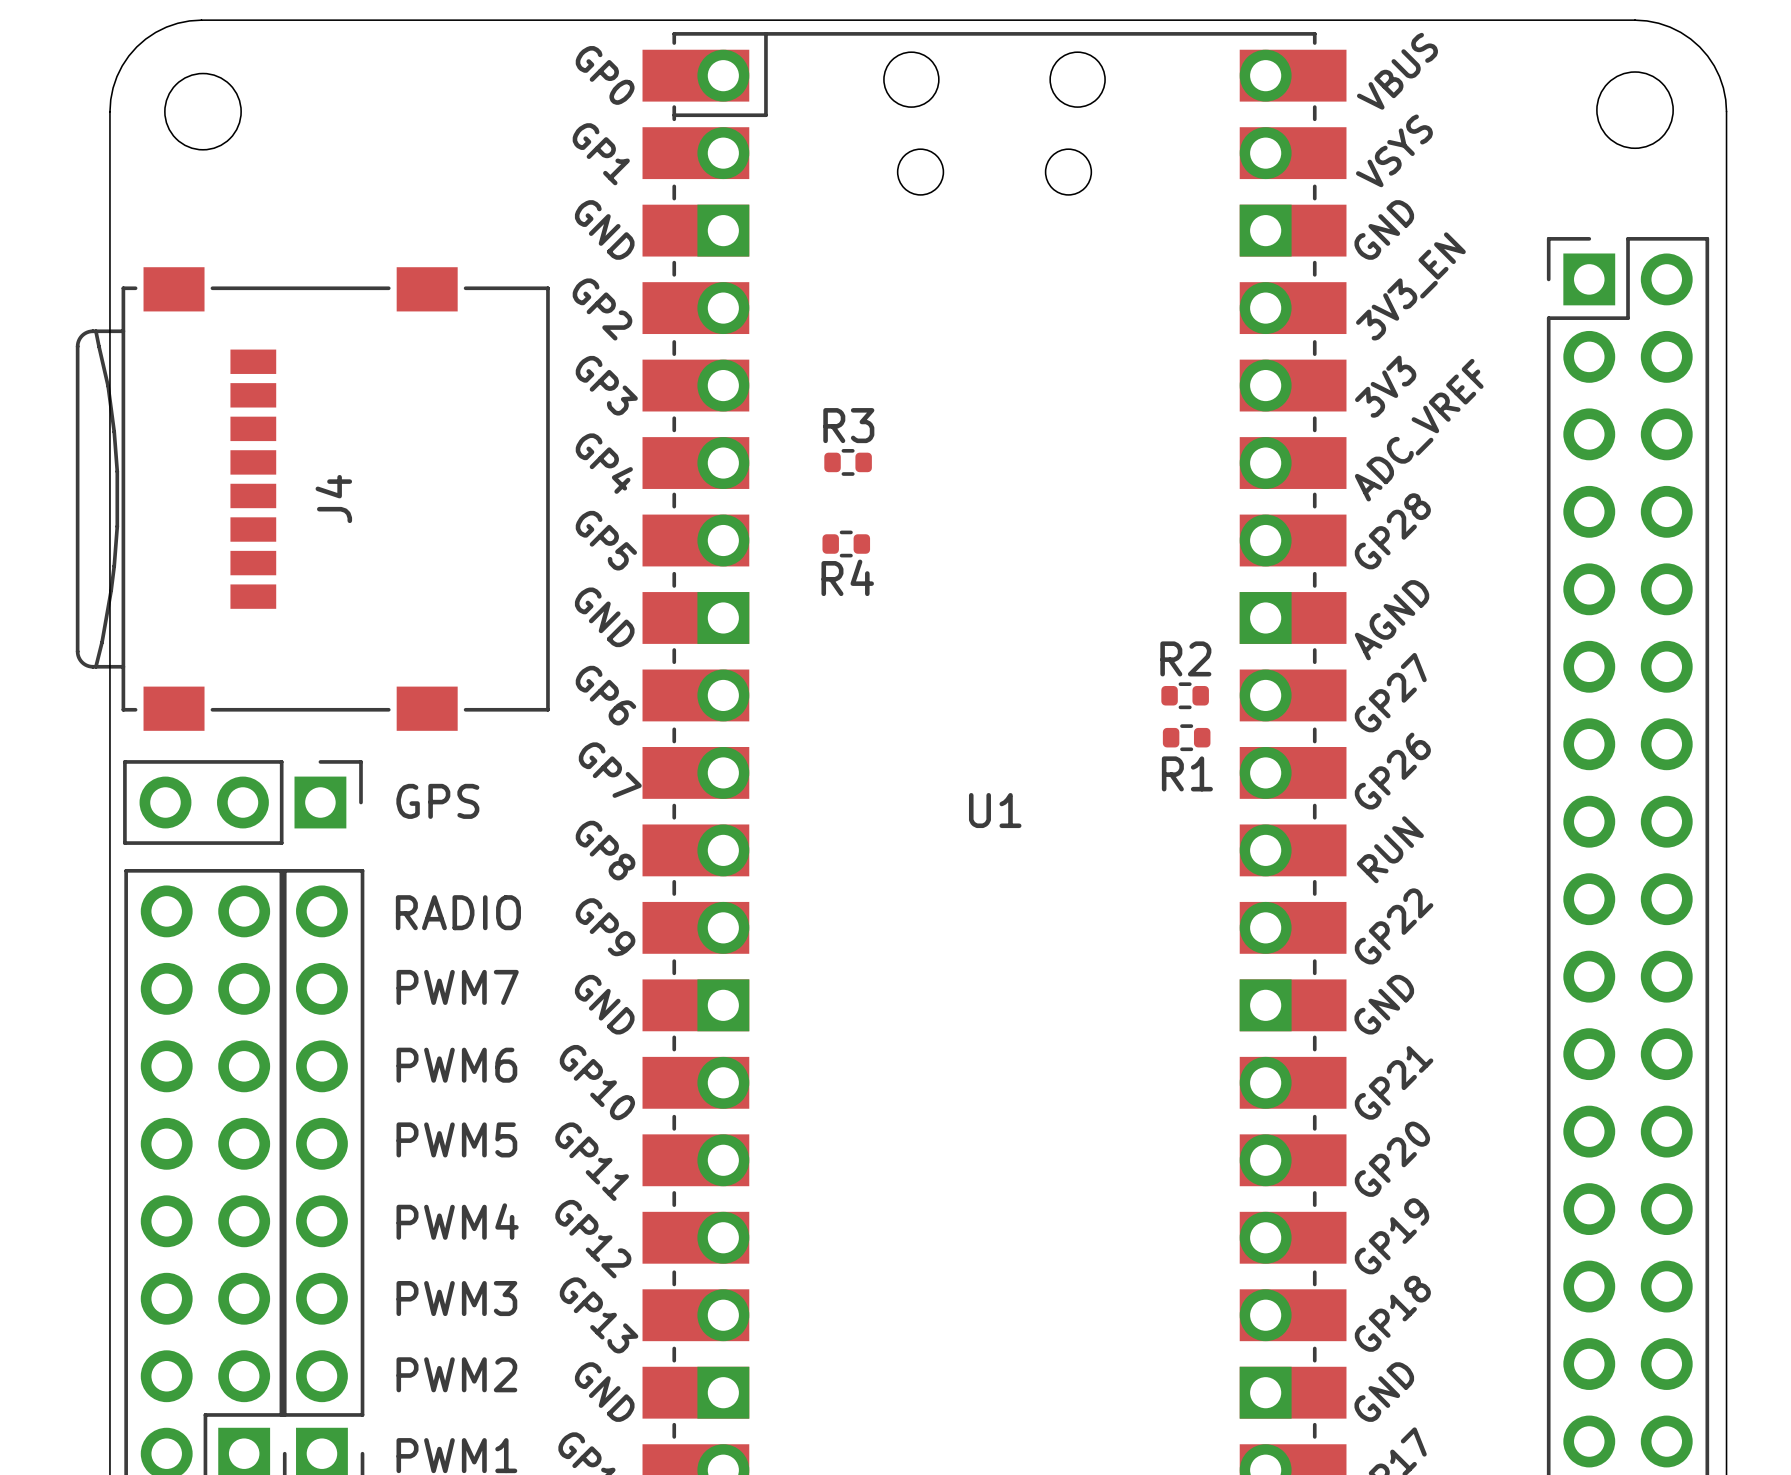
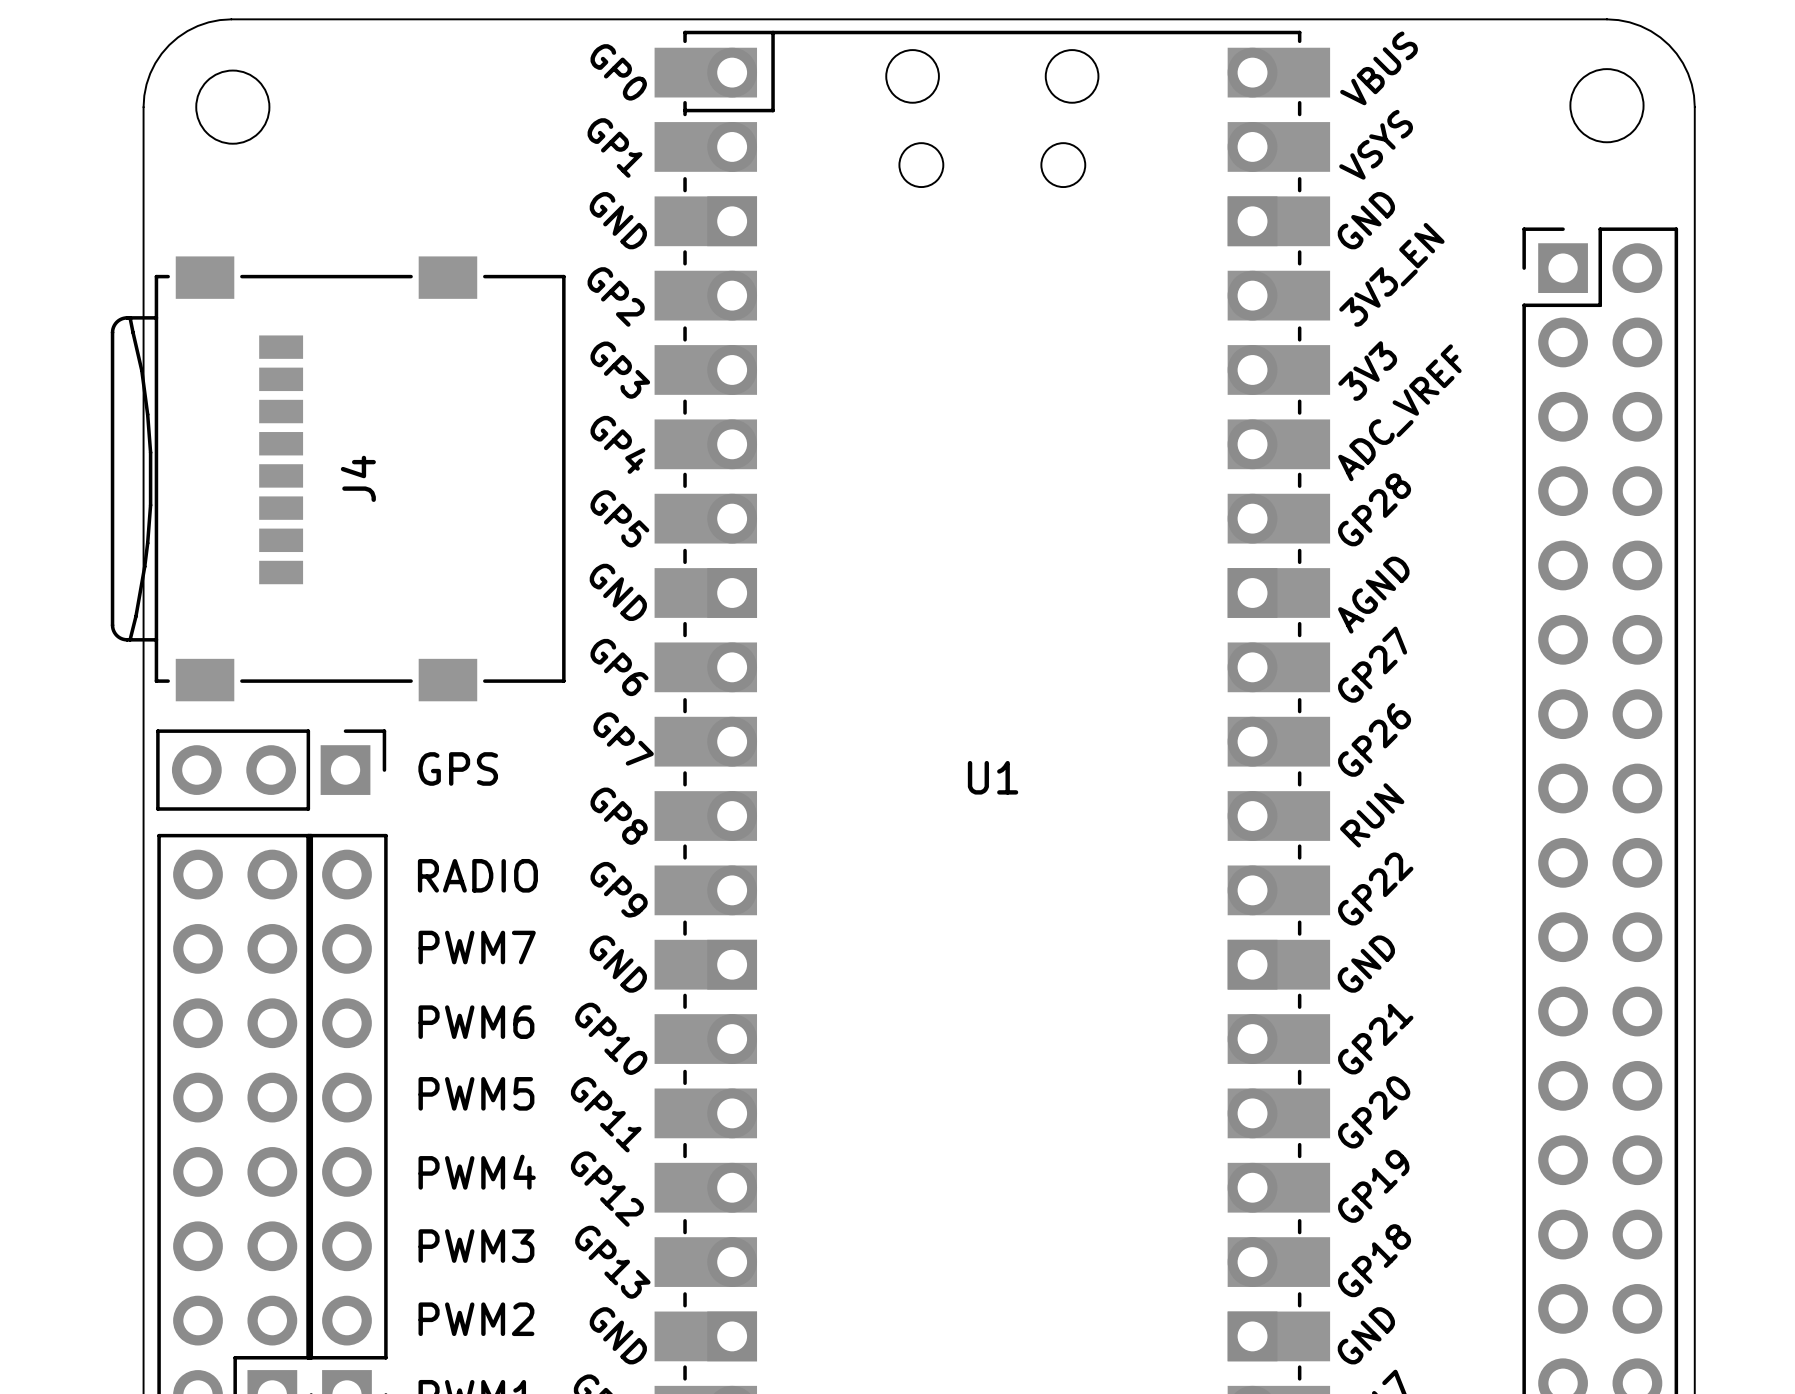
R3: (848, 462) -> none
R4: (846, 544) -> none
R2: (1185, 695) -> none
R1: (1186, 737) -> none

